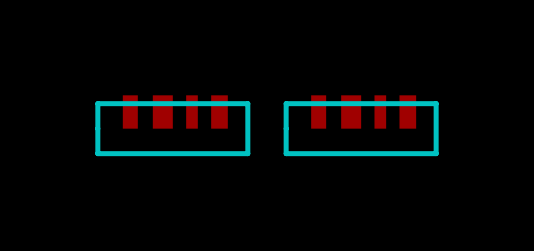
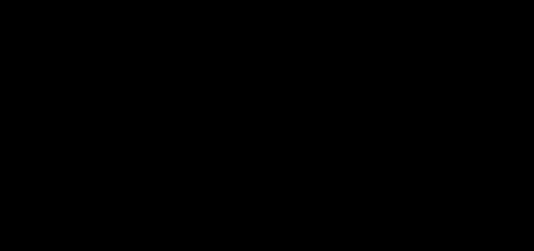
part: (172, 125) -> none
part: (361, 125) -> none

